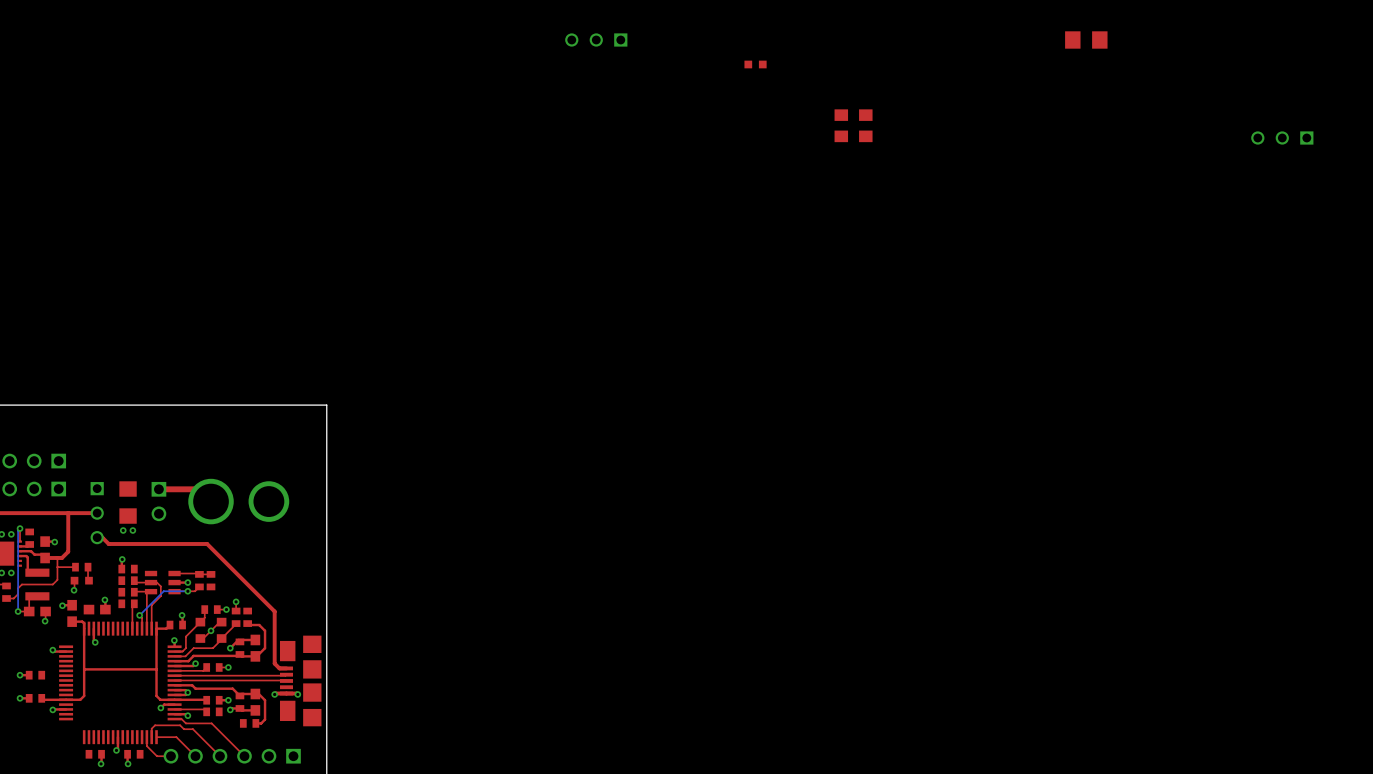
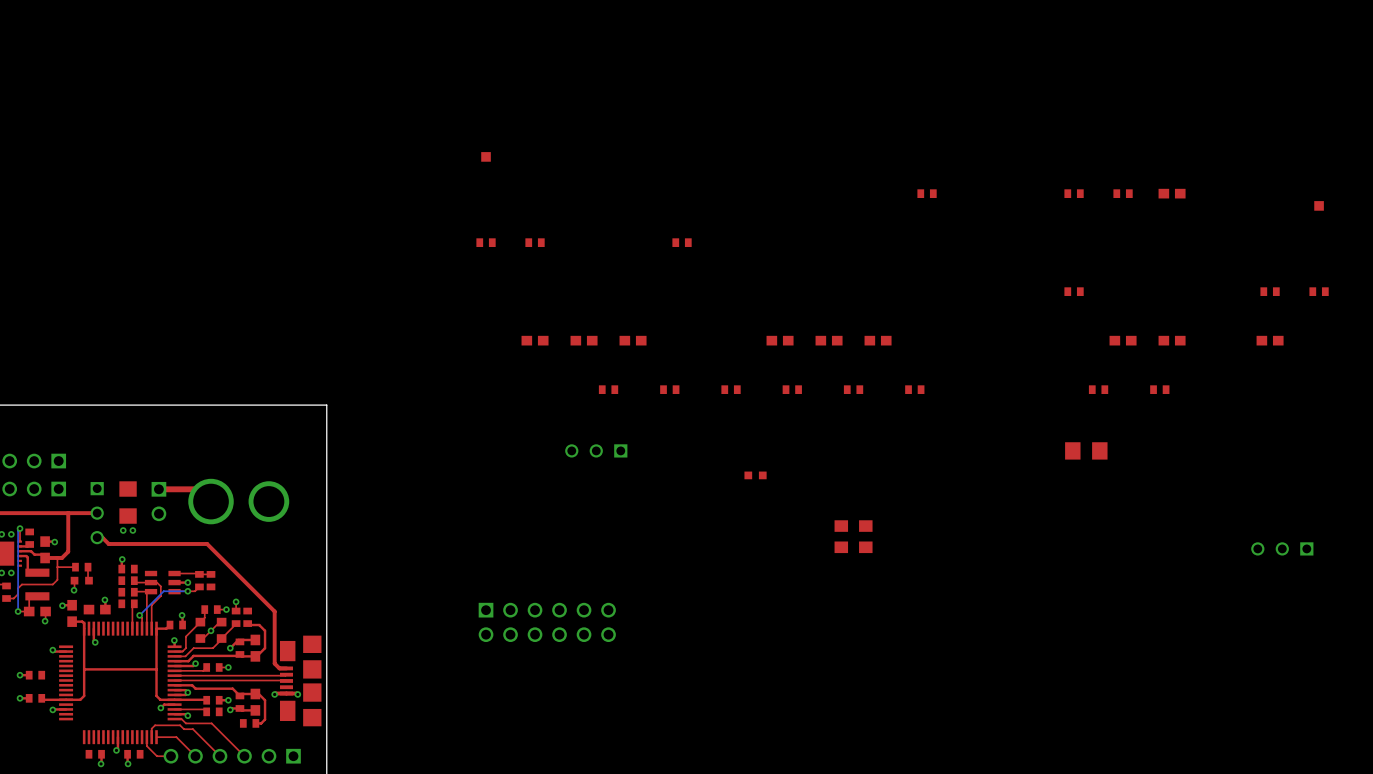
part: (596, 39) -> none
part: (1086, 39) -> none
part: (755, 64) -> none
part: (853, 125) -> none
part: (1282, 137) -> none
part: none -> (486, 156)
part: none -> (927, 193)
part: none -> (1074, 193)
part: none -> (1123, 193)
part: none -> (1172, 193)
part: none -> (1319, 205)
part: none -> (486, 242)
part: none -> (535, 242)
part: none -> (682, 242)
part: none -> (1074, 291)
part: none -> (1270, 291)
part: none -> (1319, 291)
part: none -> (535, 340)
part: none -> (584, 340)
part: none -> (633, 340)
part: none -> (780, 340)
part: none -> (829, 340)
part: none -> (878, 340)
part: none -> (1123, 340)
part: none -> (1172, 340)
part: none -> (1270, 340)
part: none -> (608, 389)
part: none -> (669, 389)
part: none -> (731, 389)
part: none -> (792, 389)
part: none -> (853, 389)
part: none -> (914, 389)
part: none -> (1098, 389)
part: none -> (1159, 389)
part: none -> (596, 450)
part: none -> (1086, 450)
part: none -> (755, 475)
part: none -> (853, 536)
part: none -> (1282, 548)
part: none -> (547, 622)

